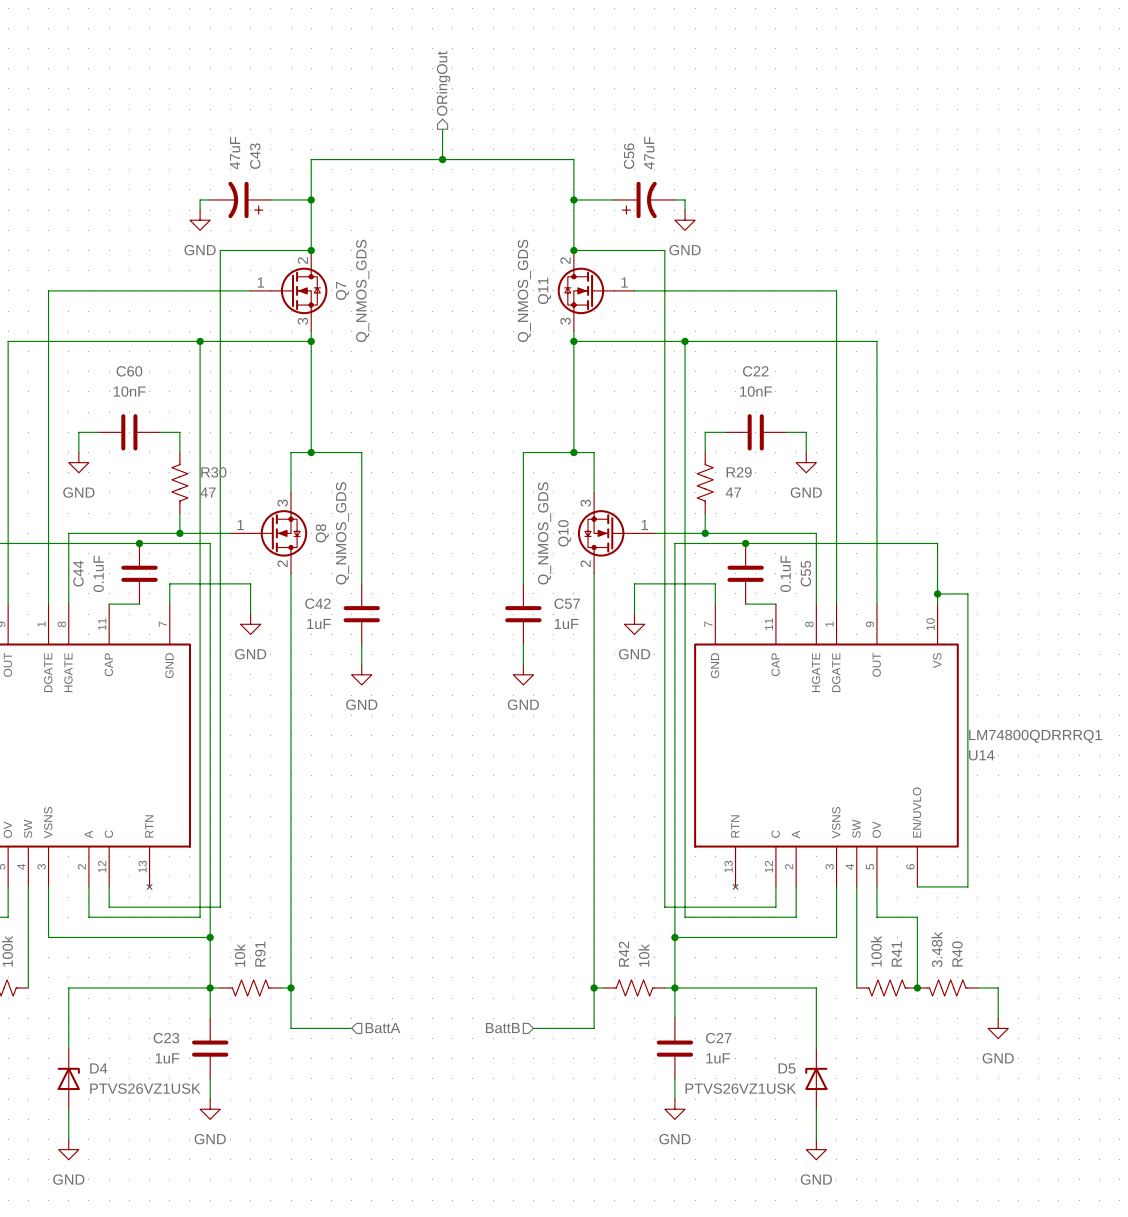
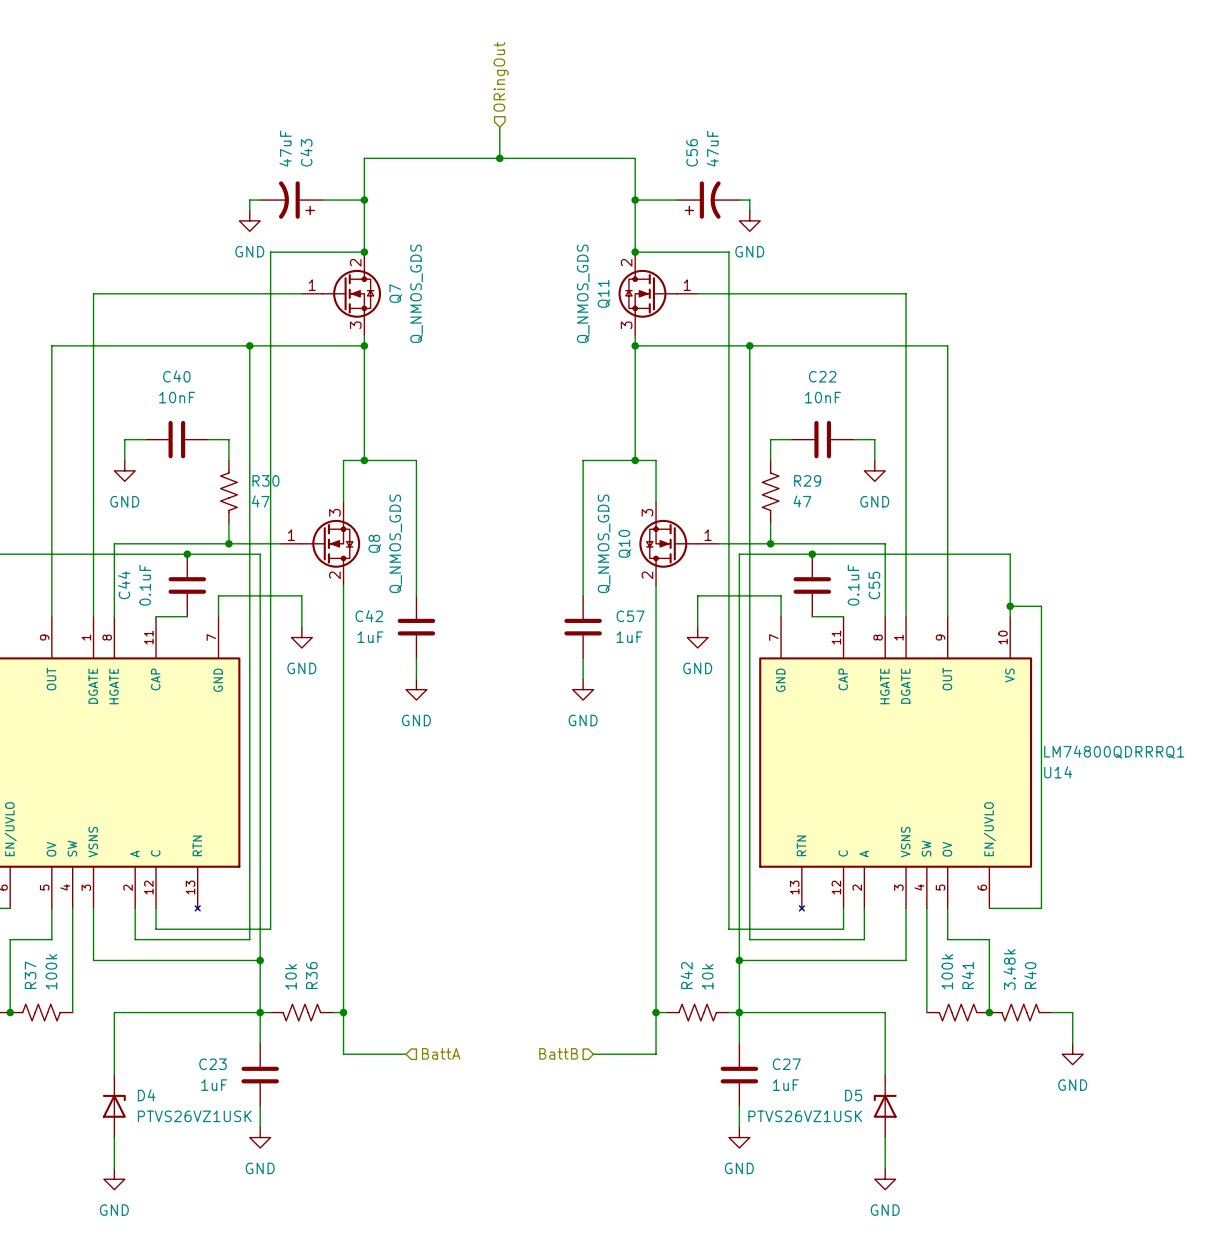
hierarchical label shape: output (443, 83) -> input (501, 76)
C60 name: C60 (129, 371) -> C40 (176, 376)
R91 name: R91 (260, 954) -> R36 (311, 975)

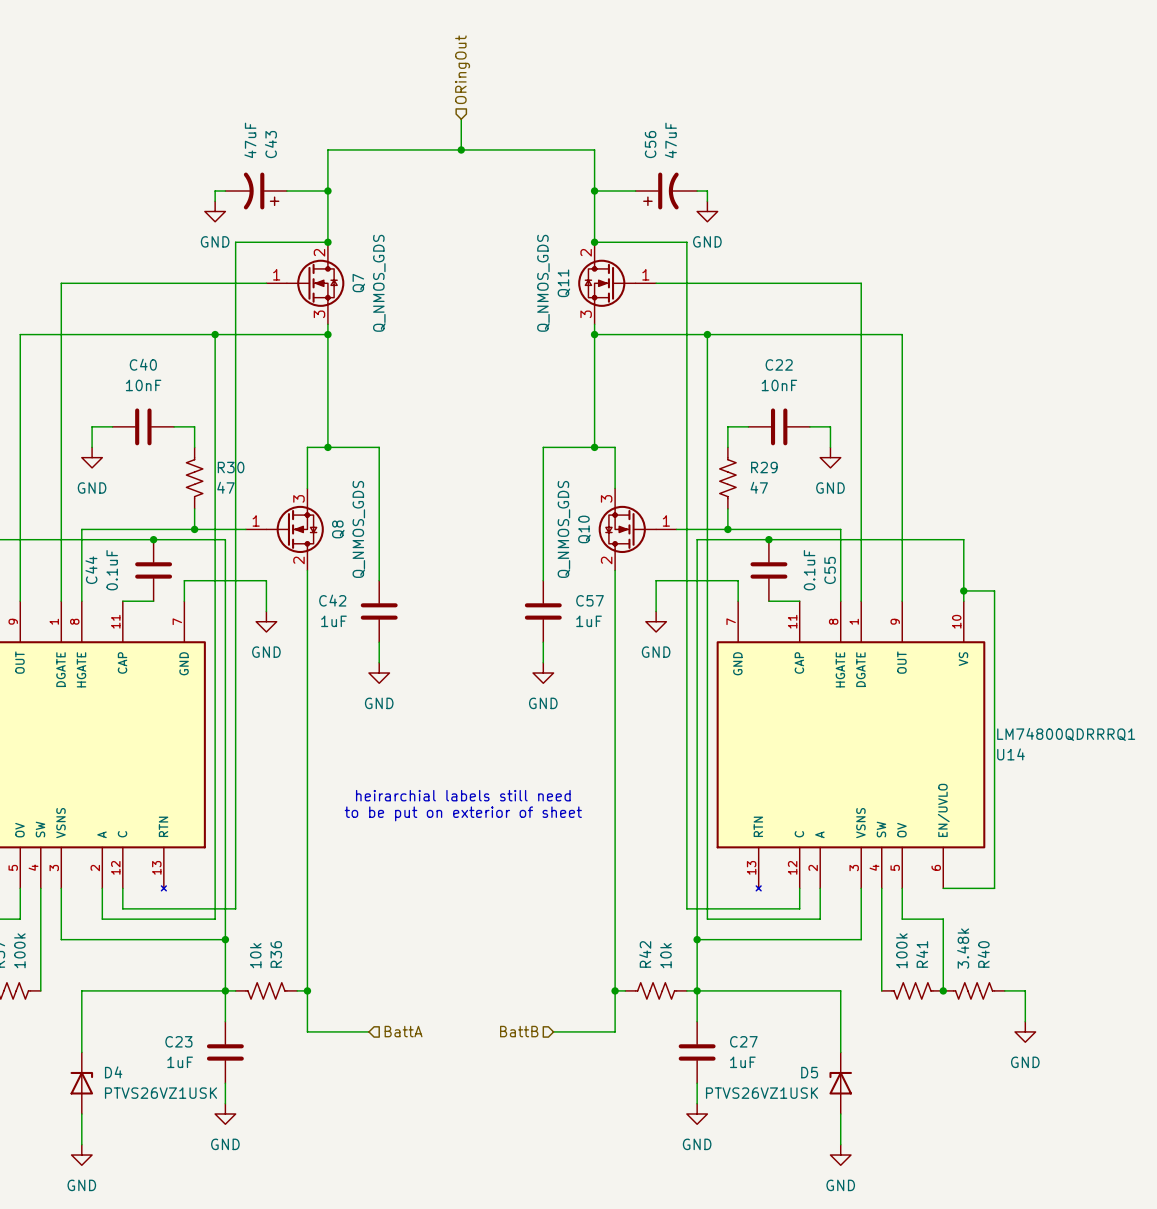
text: none -> heirarchial labels still need (463, 795)
text: none -> to be put on exterior of sheet (463, 813)

